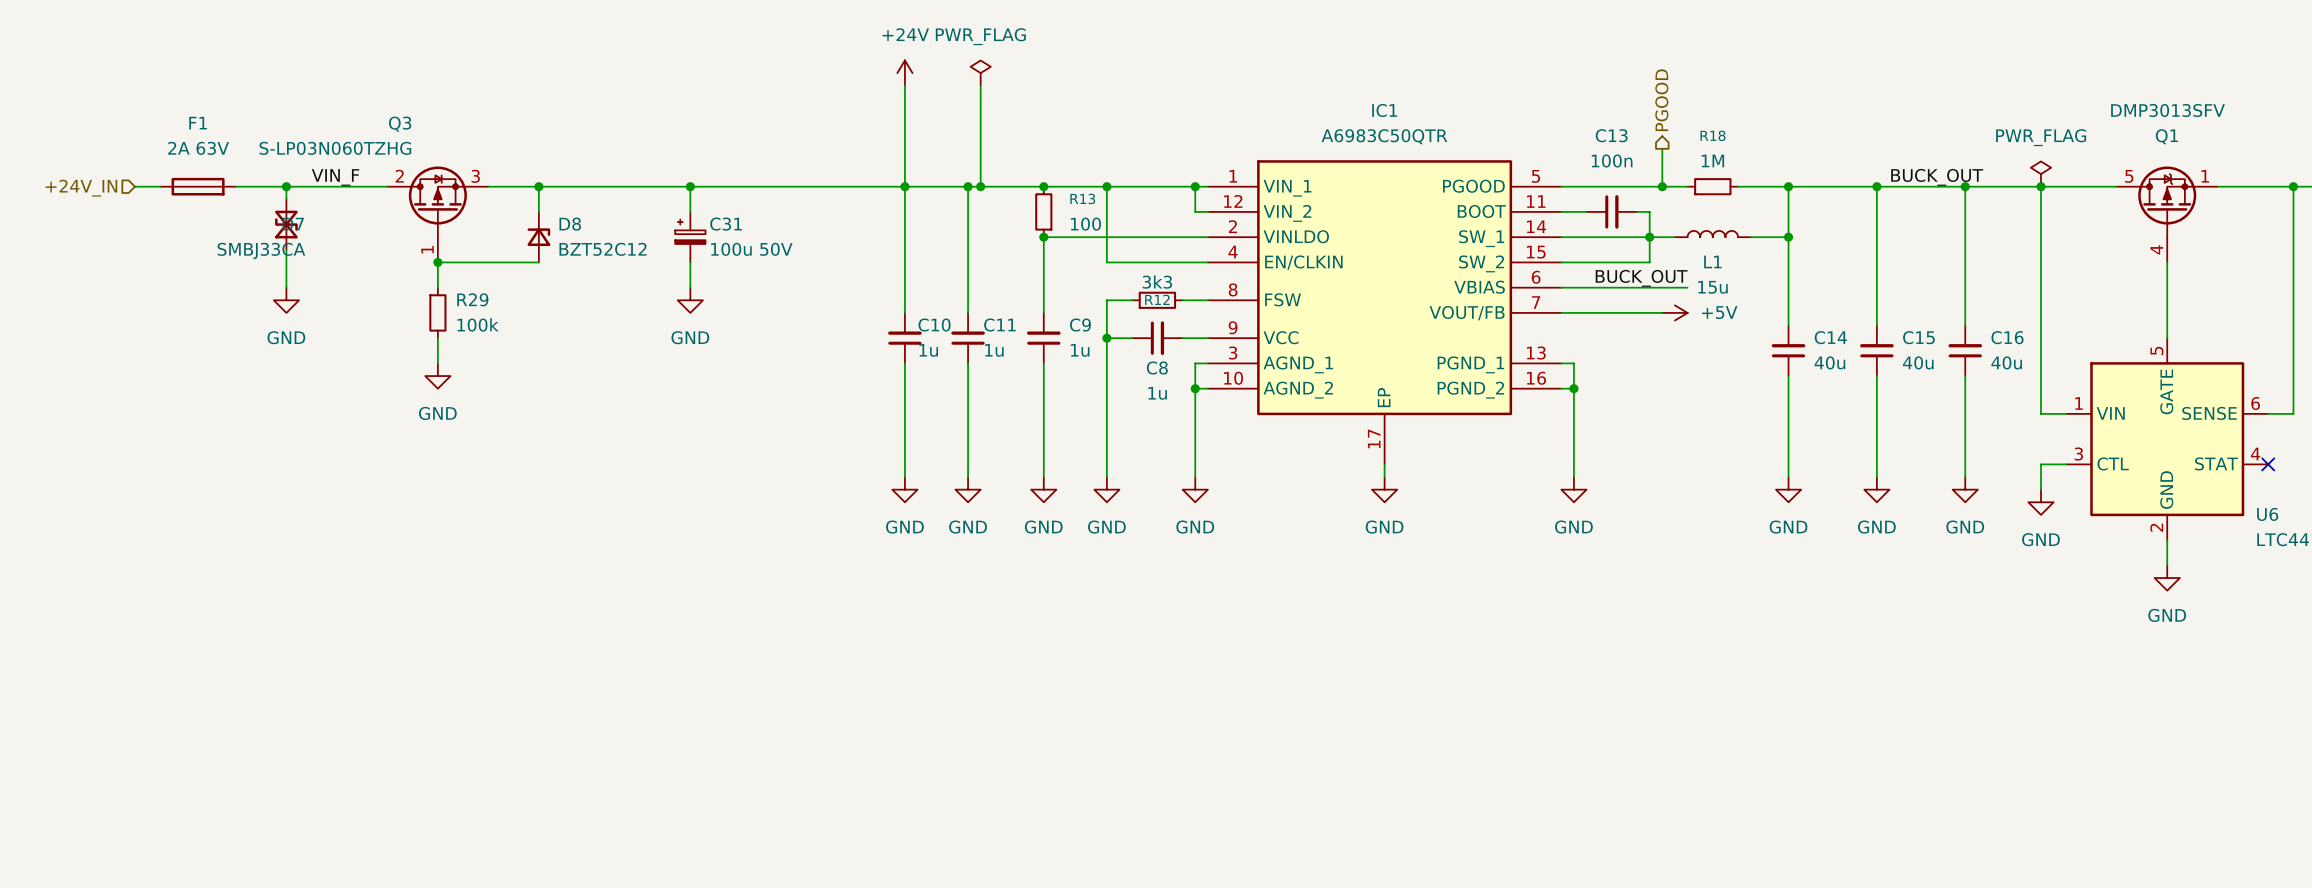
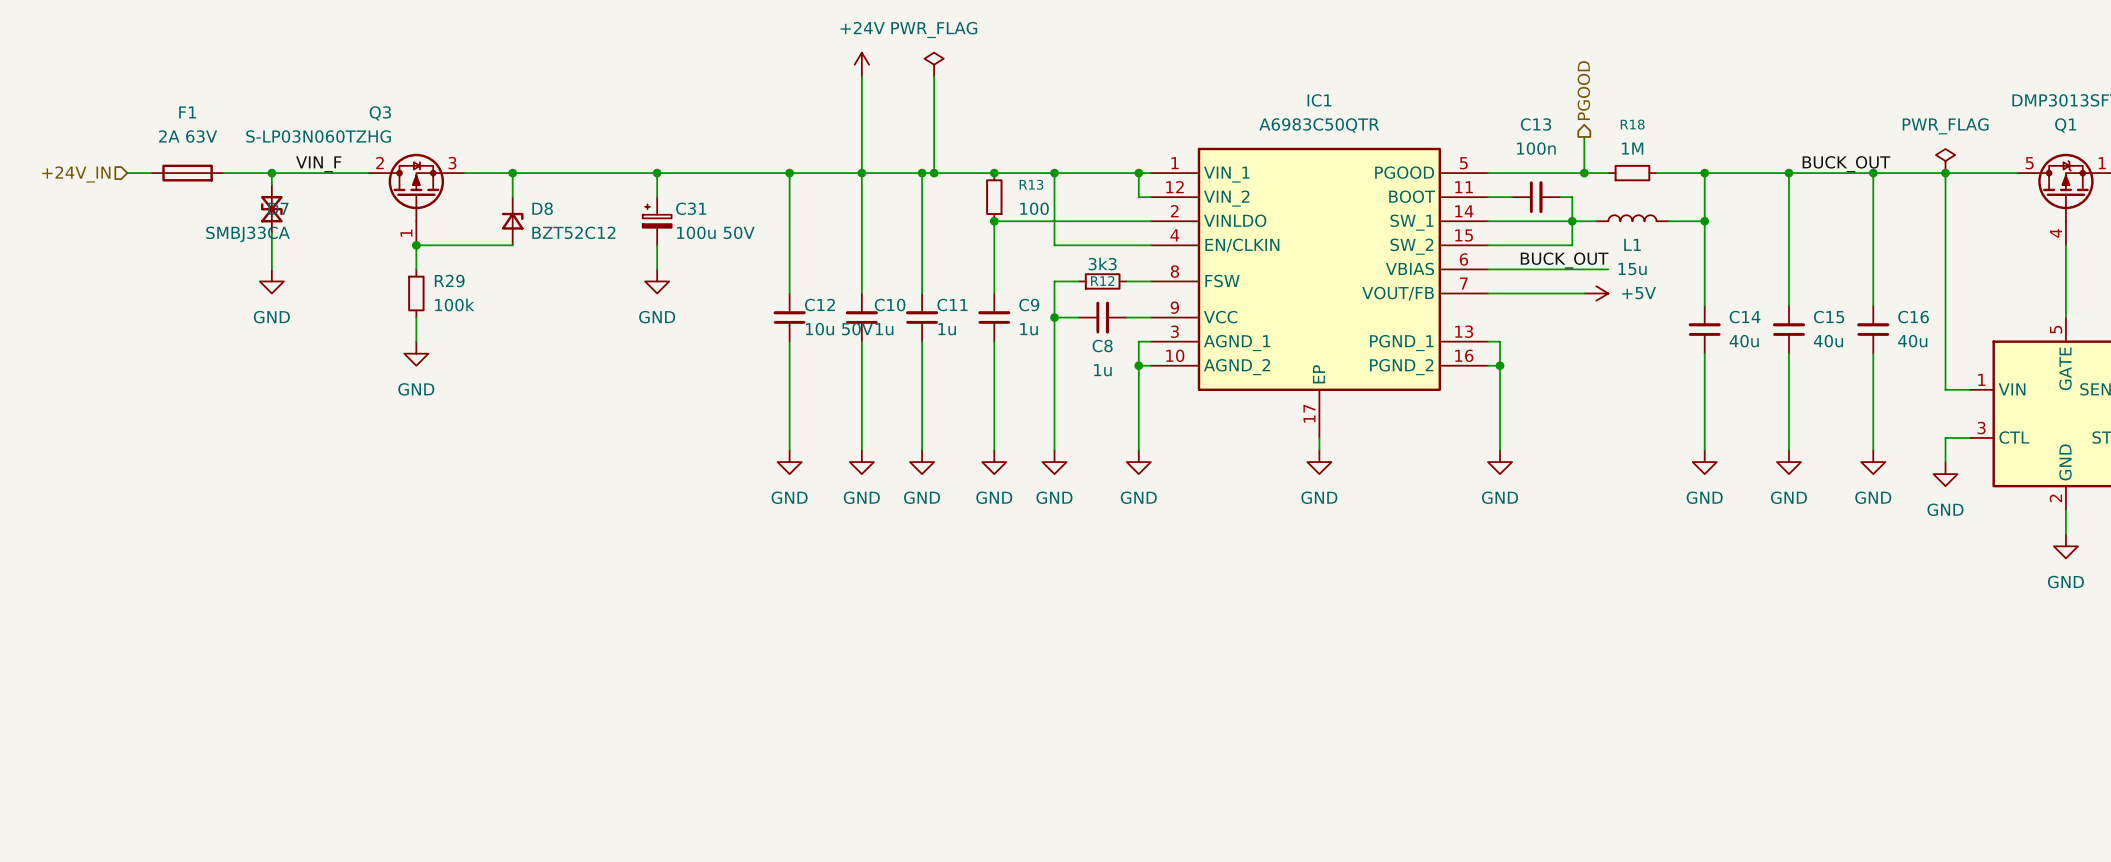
wire: none -> (789, 173) (789, 293)
junction: none -> (789, 173)
C12: none -> 10u 50V (789, 317)
wire: none -> (789, 341) (789, 450)
power symbol: none -> GND (789, 462)

